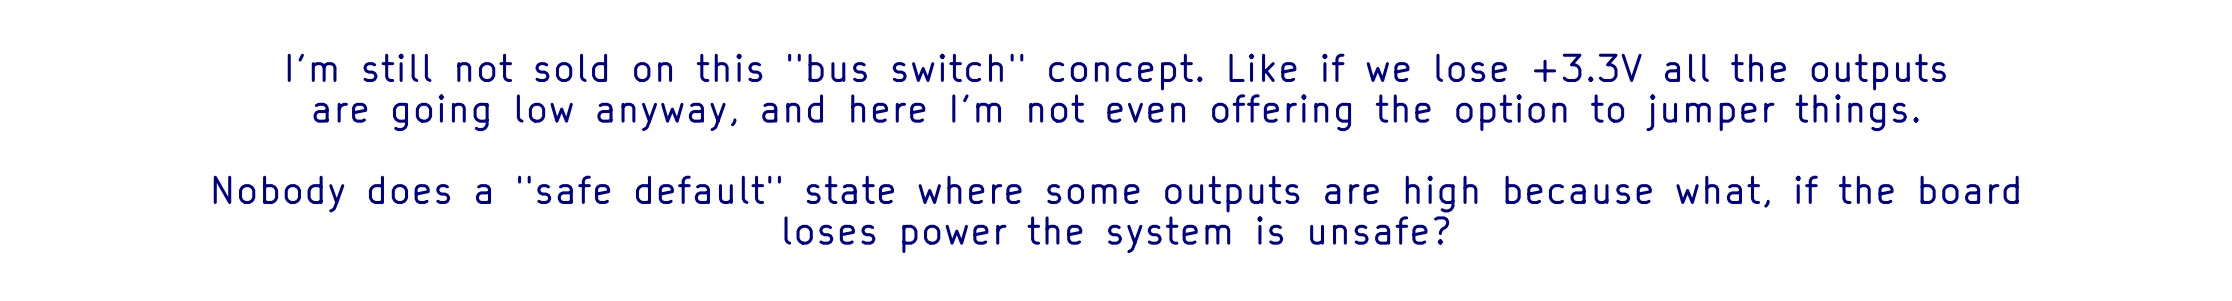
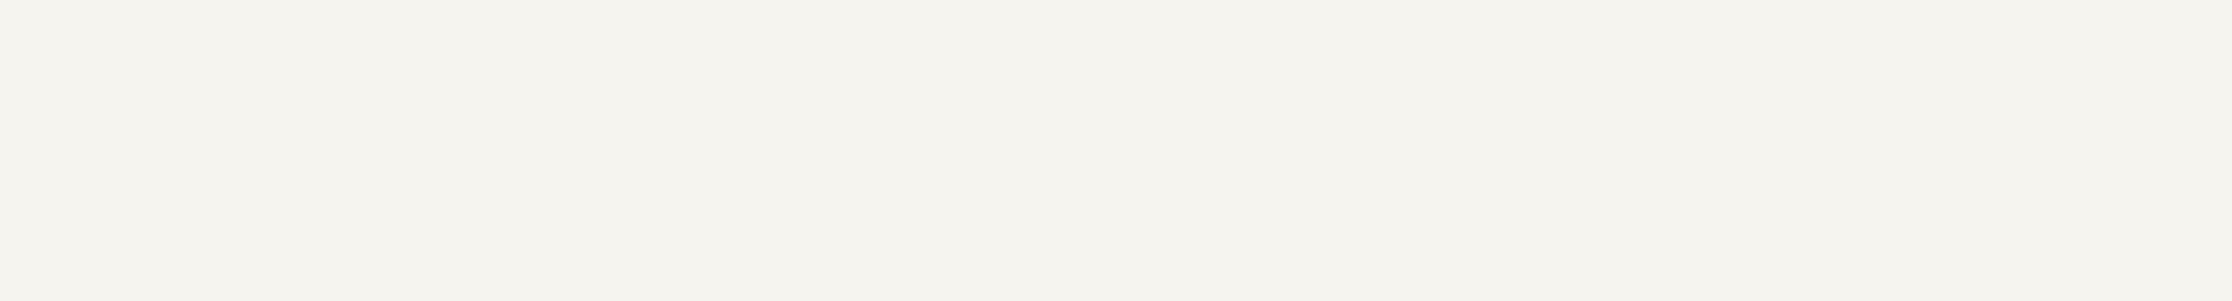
text: I'm still not sold on this "bus switch" concept. Like if we lose +3.3V all the outputs (1116, 72) -> none
text: are going low anyway, and here I'm not even offering the option to jumper things. (1116, 112) -> none
text: Nobody does a "safe default" state where some outputs are high because what, if the board (1116, 194) -> none
text: loses power the system is unsafe? (1116, 234) -> none

